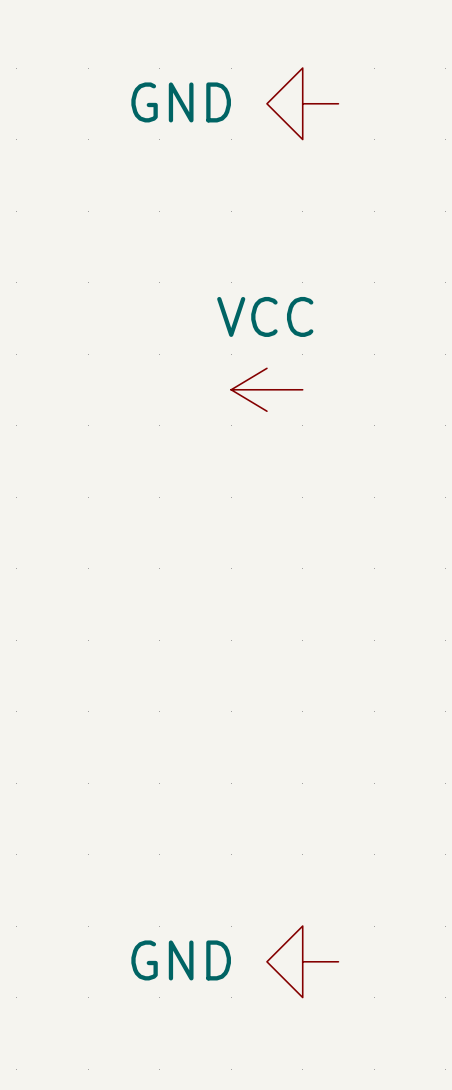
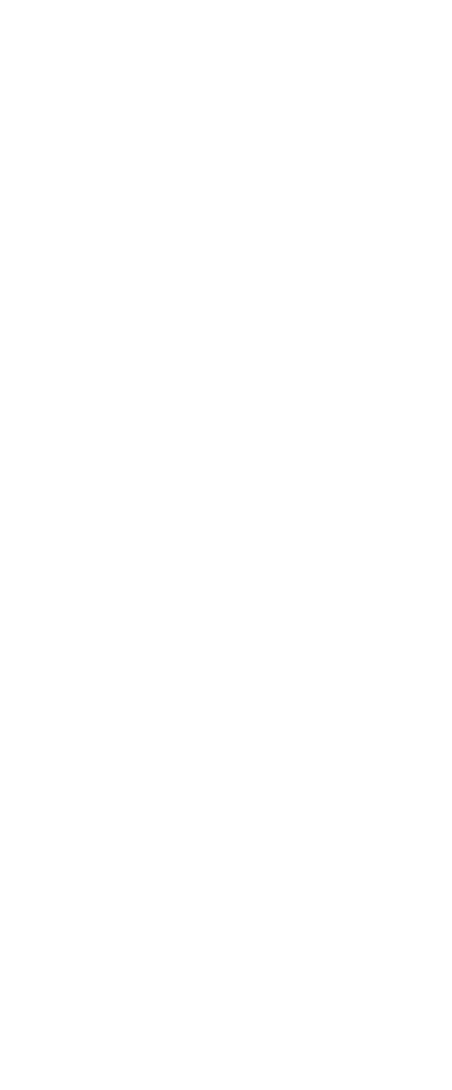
power symbol: GND (302, 103) -> none
power symbol: VCC (266, 389) -> none
power symbol: GND (302, 961) -> none

